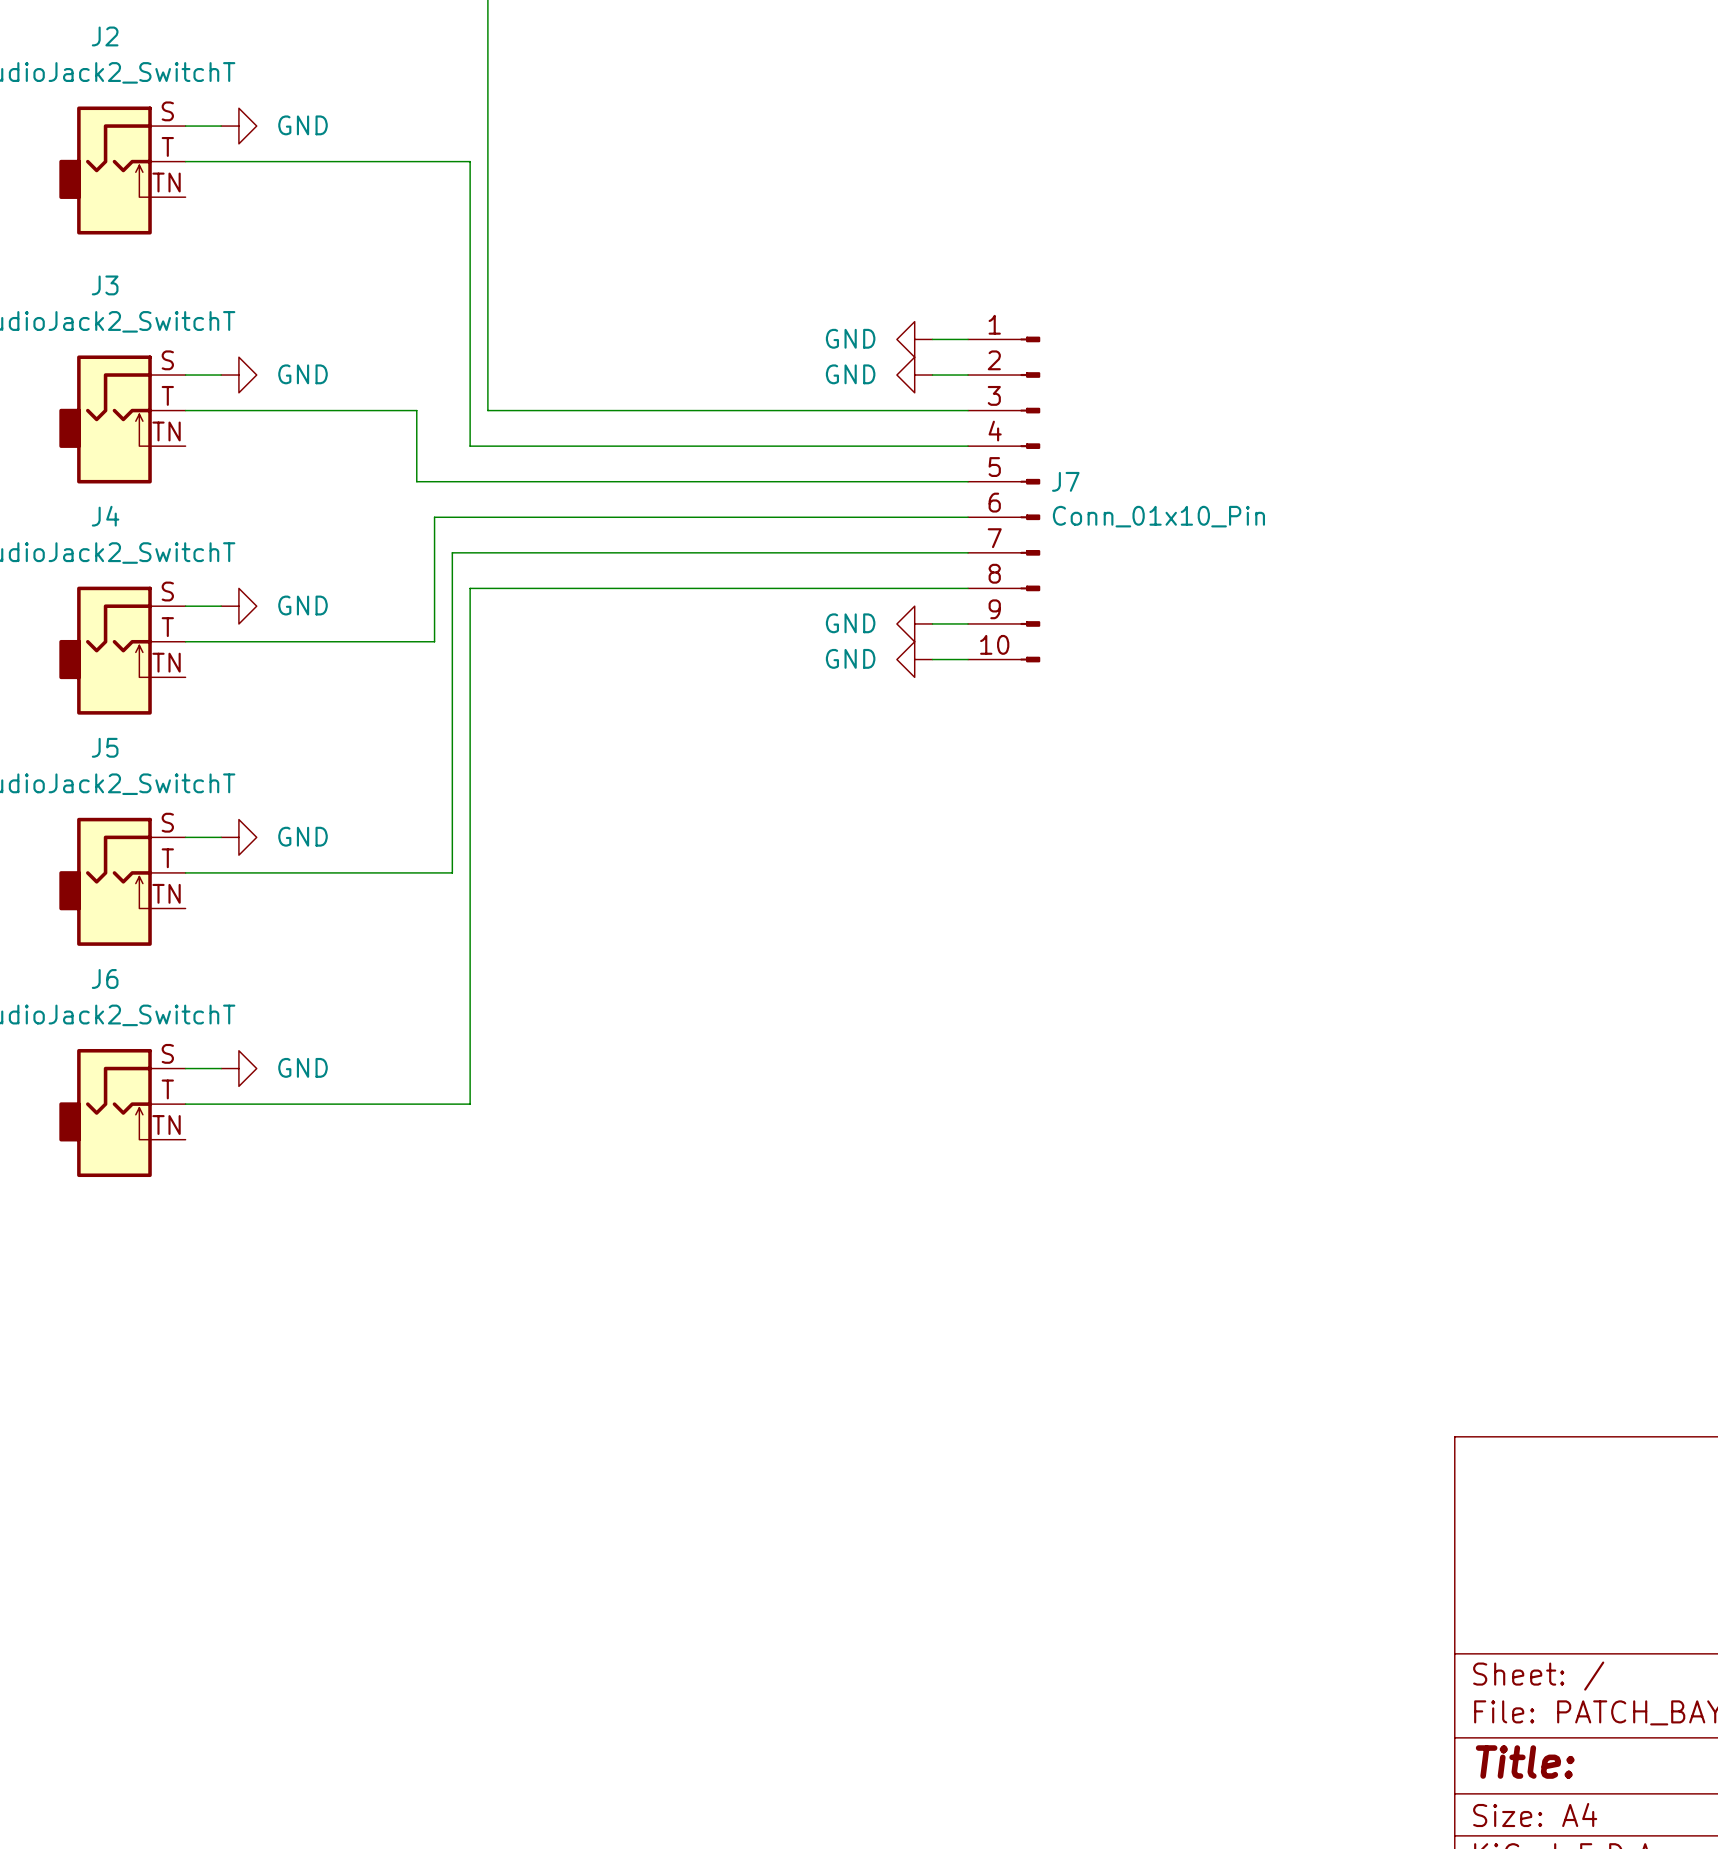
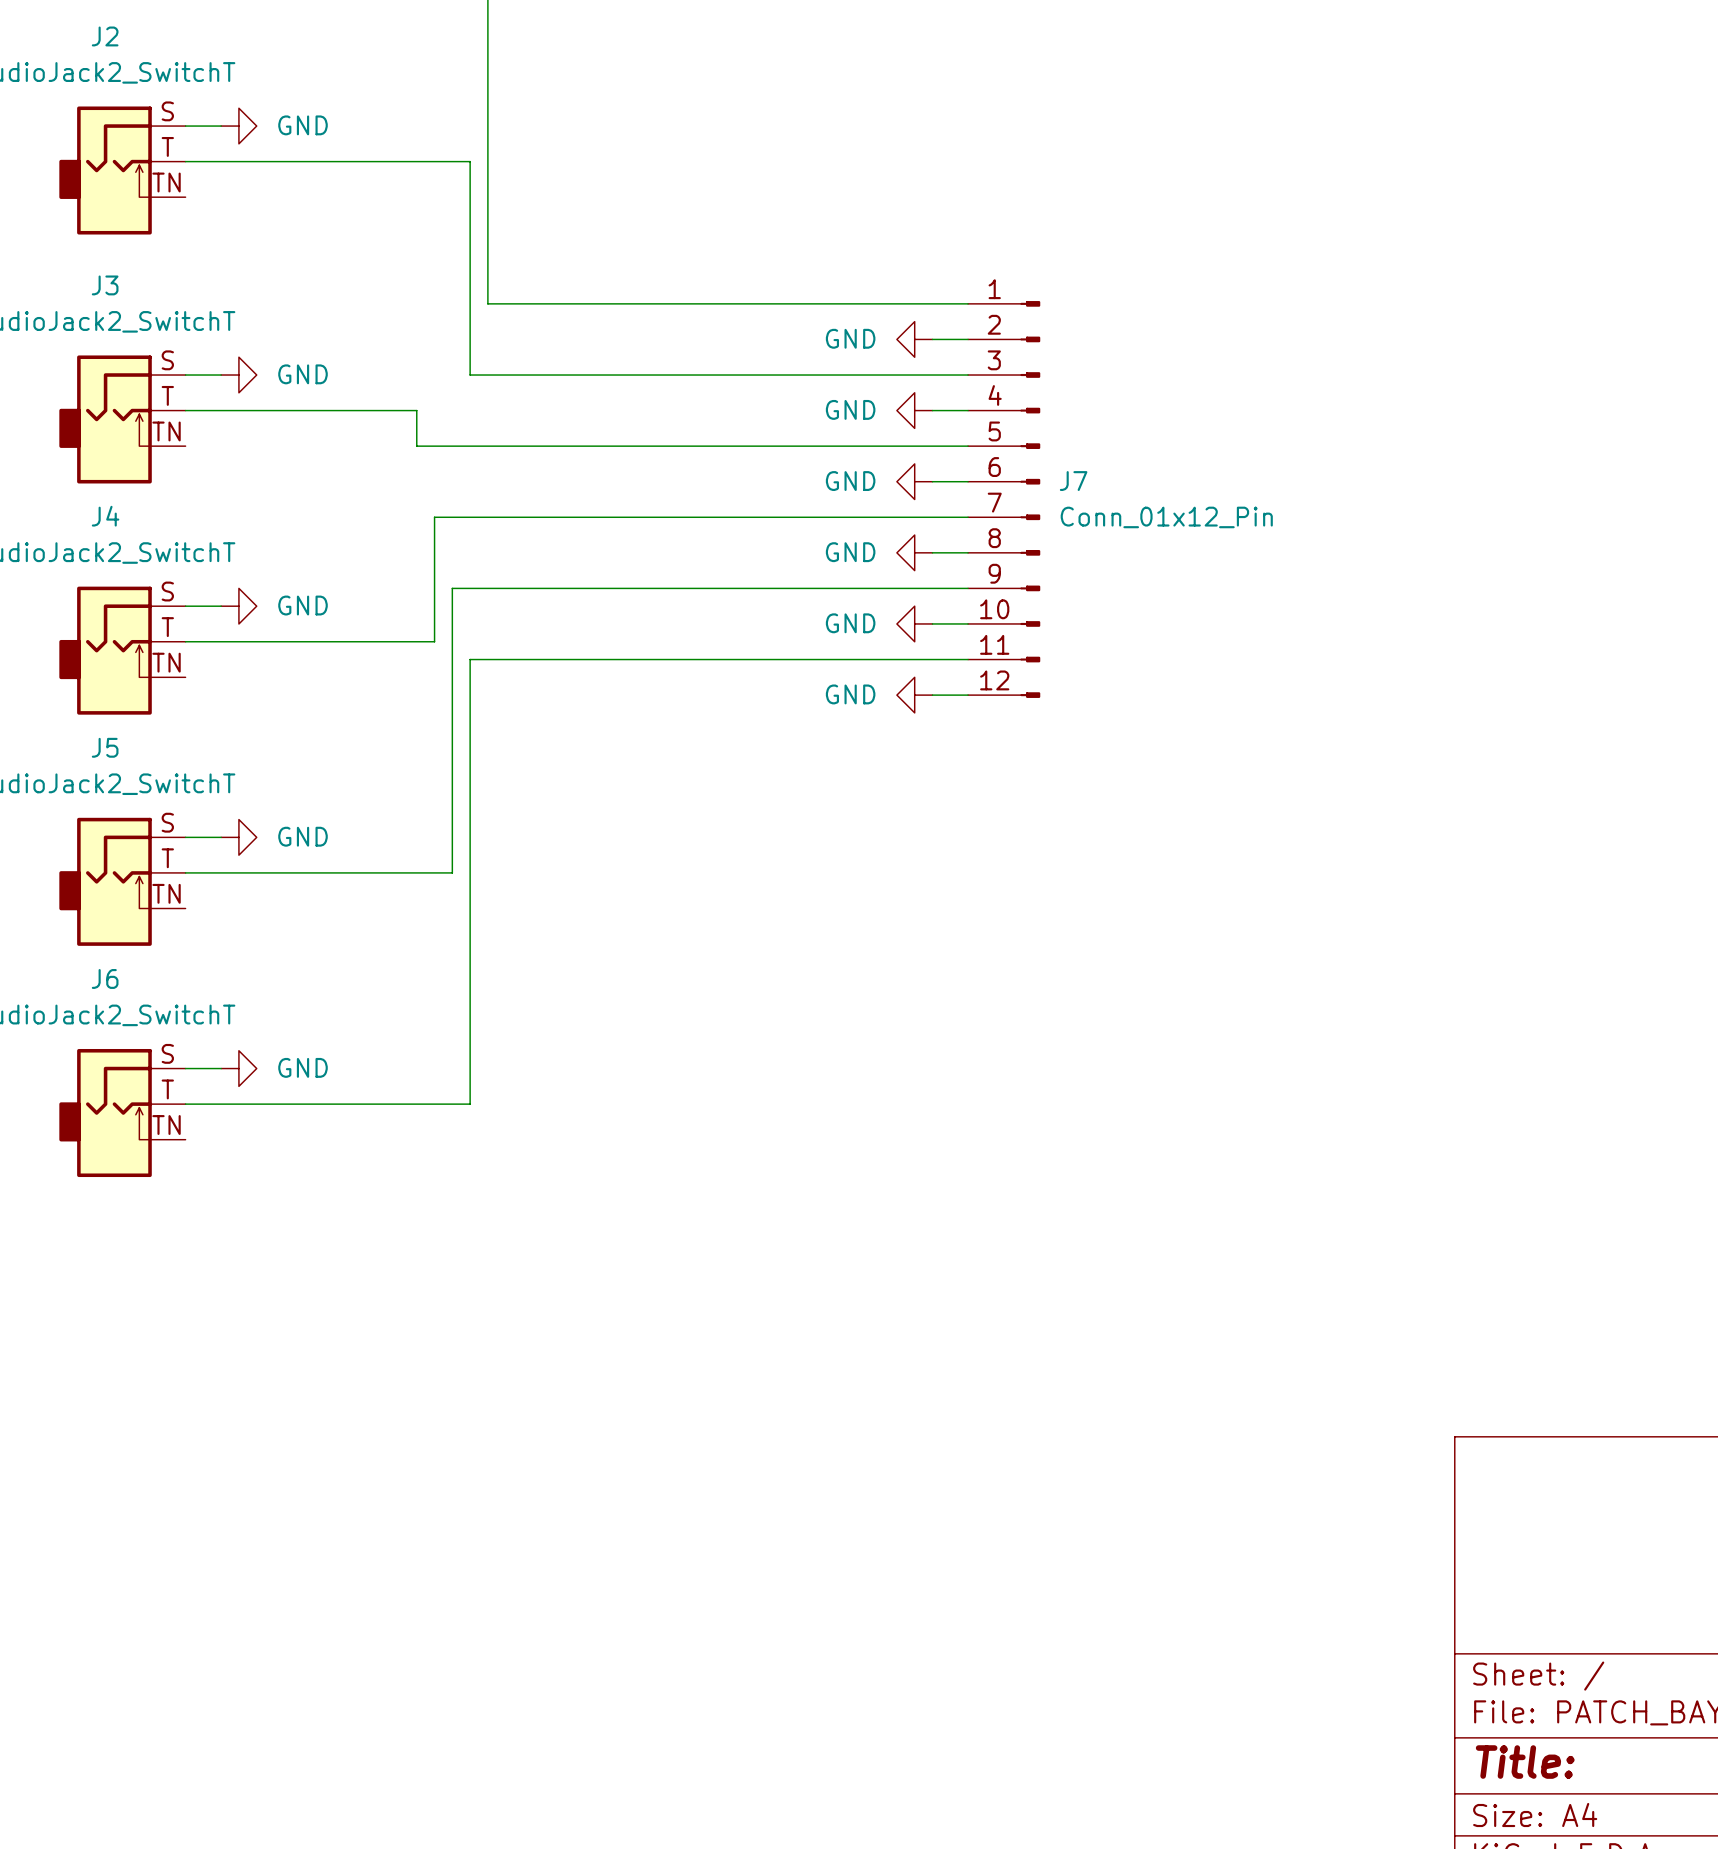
wire: (487, 303) (487, 410) (932, 410) -> (487, 303) (968, 303)
J7 symbol: [968, 336, 1041, 663] -> [968, 301, 1041, 698]
wire: (470, 375) (470, 446) -> (416, 446) (470, 446)
wire: none -> (470, 375) (932, 375)
power symbol position: GND (914, 375) -> GND (914, 410)
wire: (416, 446) (416, 481) (932, 481) -> none
power symbol: none -> GND (914, 481)
J7 value: Conn_01x10_Pin (1158, 516) -> Conn_01x12_Pin (1166, 517)
power symbol: none -> GND (914, 552)
wire: (932, 552) (452, 552) (452, 588) -> none
wire: (470, 588) (470, 659) -> (470, 588) (452, 588)
wire: none -> (470, 659) (932, 659)
power symbol position: GND (914, 659) -> GND (914, 695)
wire: none -> (932, 695) (968, 695)

